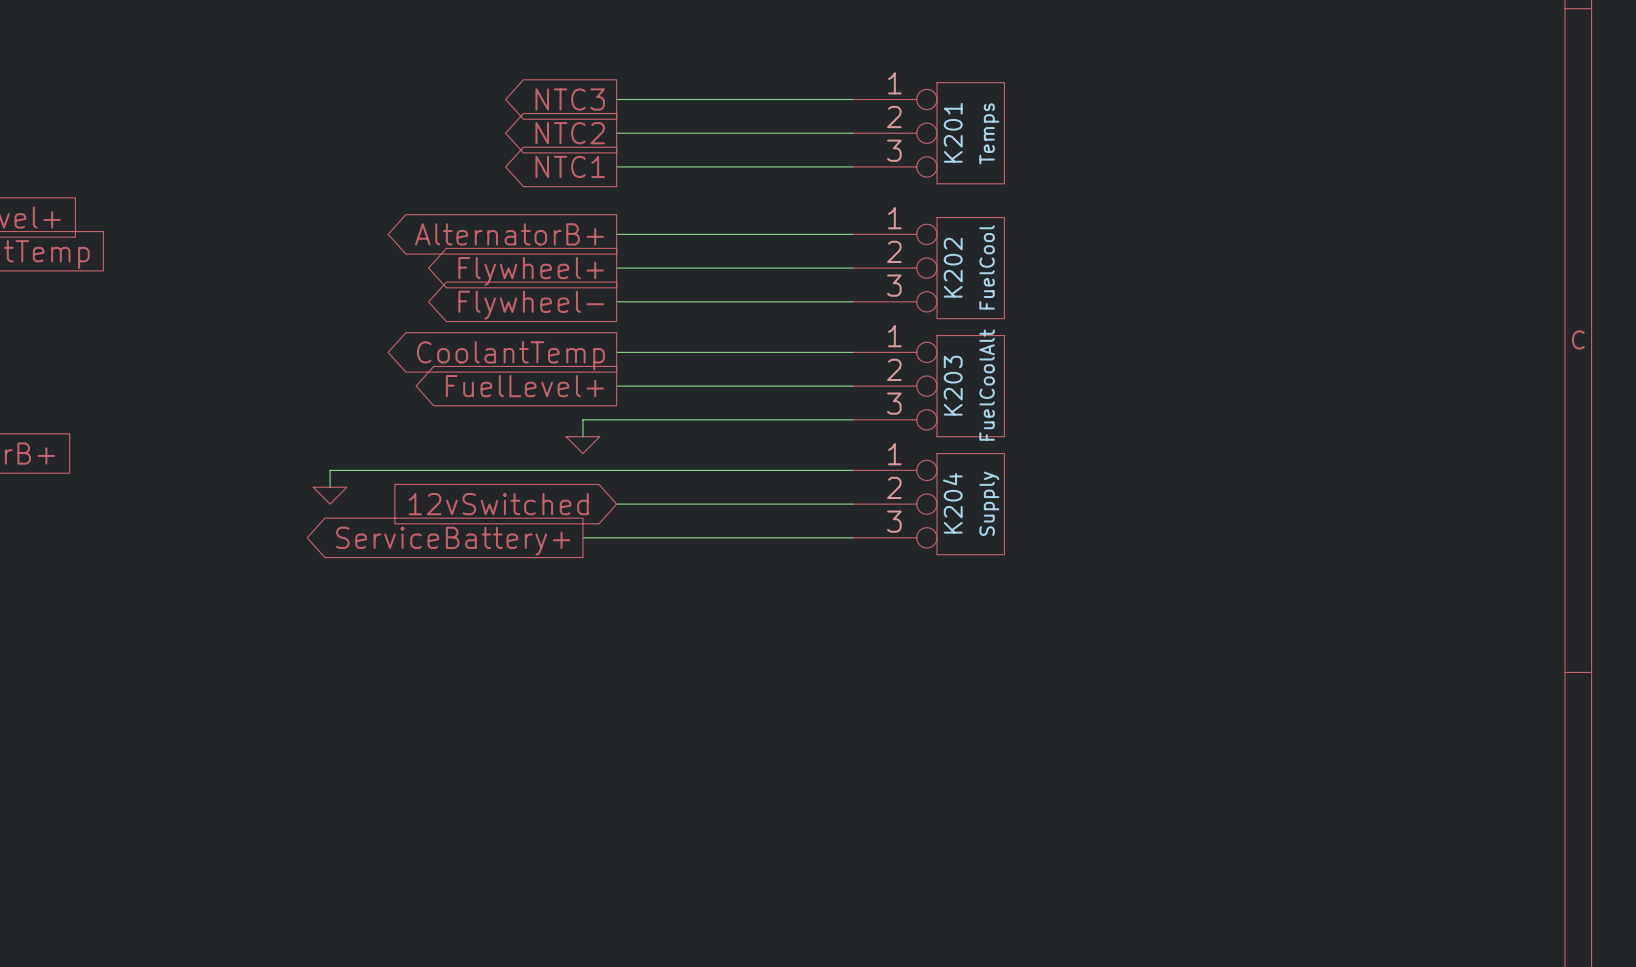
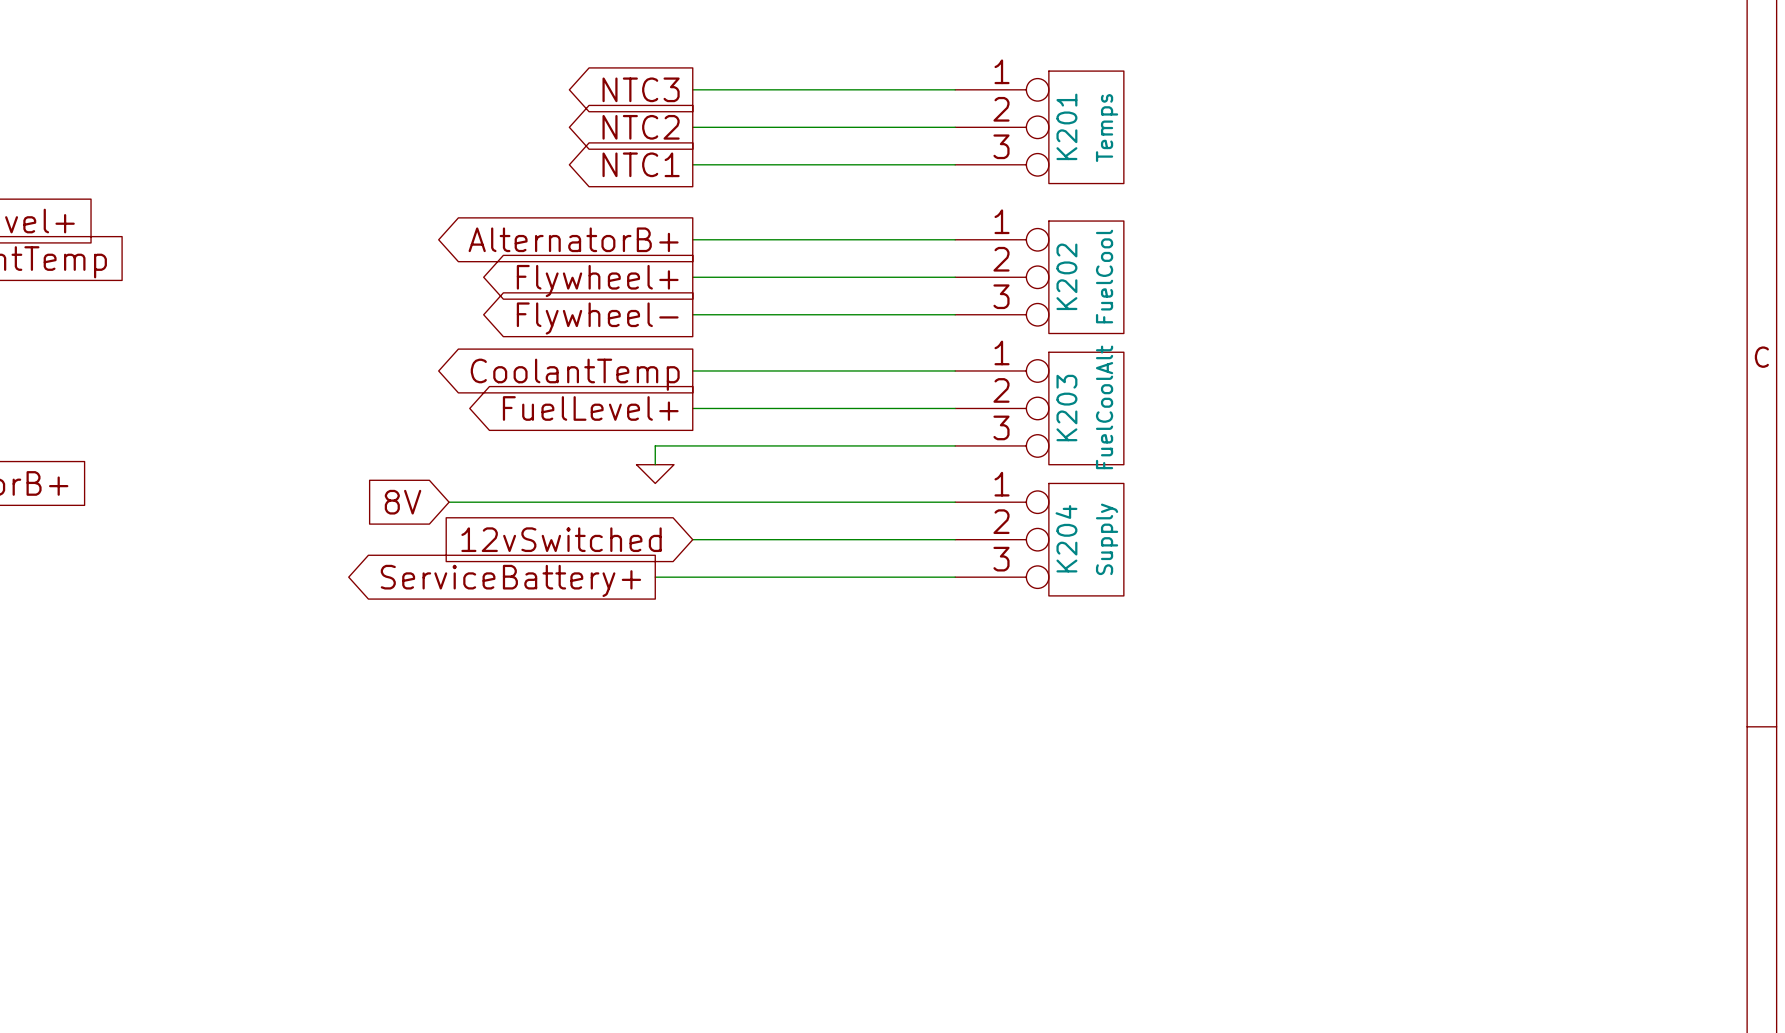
global label: none -> 8V (403, 502)
wire: (397, 470) (330, 470) (330, 487) -> none
power symbol: (330, 495) -> none

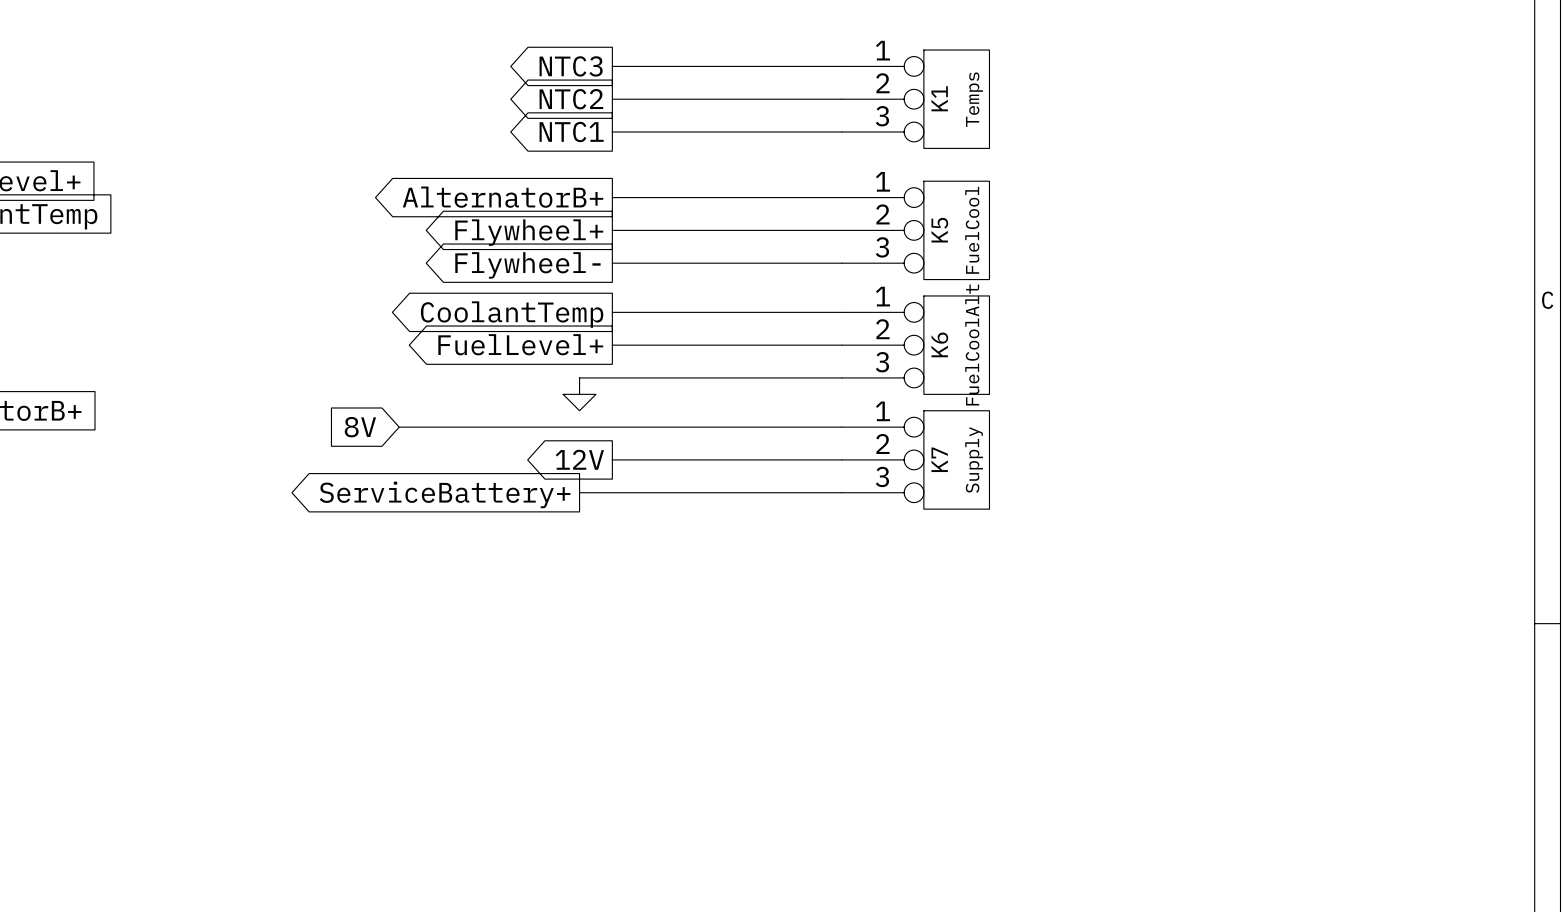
K201 name: K201 (1066, 126) -> K1 (939, 98)
K202 name: K202 (1066, 276) -> K5 (939, 230)
K203 name: K203 (1066, 408) -> K6 (939, 344)
K204 name: K204 (1066, 538) -> K7 (939, 459)
global label shape: input (561, 539) -> output (579, 459)
global label: 12vSwitched (561, 539) -> 12V (579, 459)

